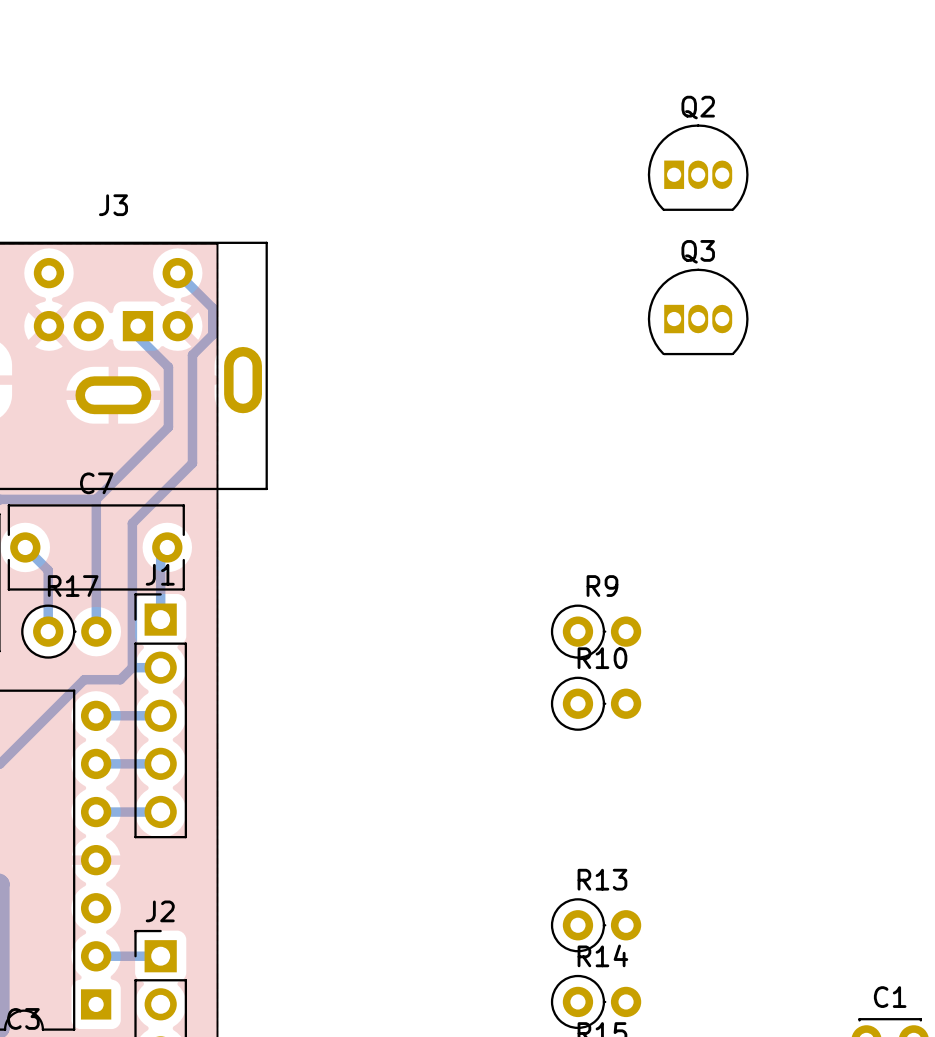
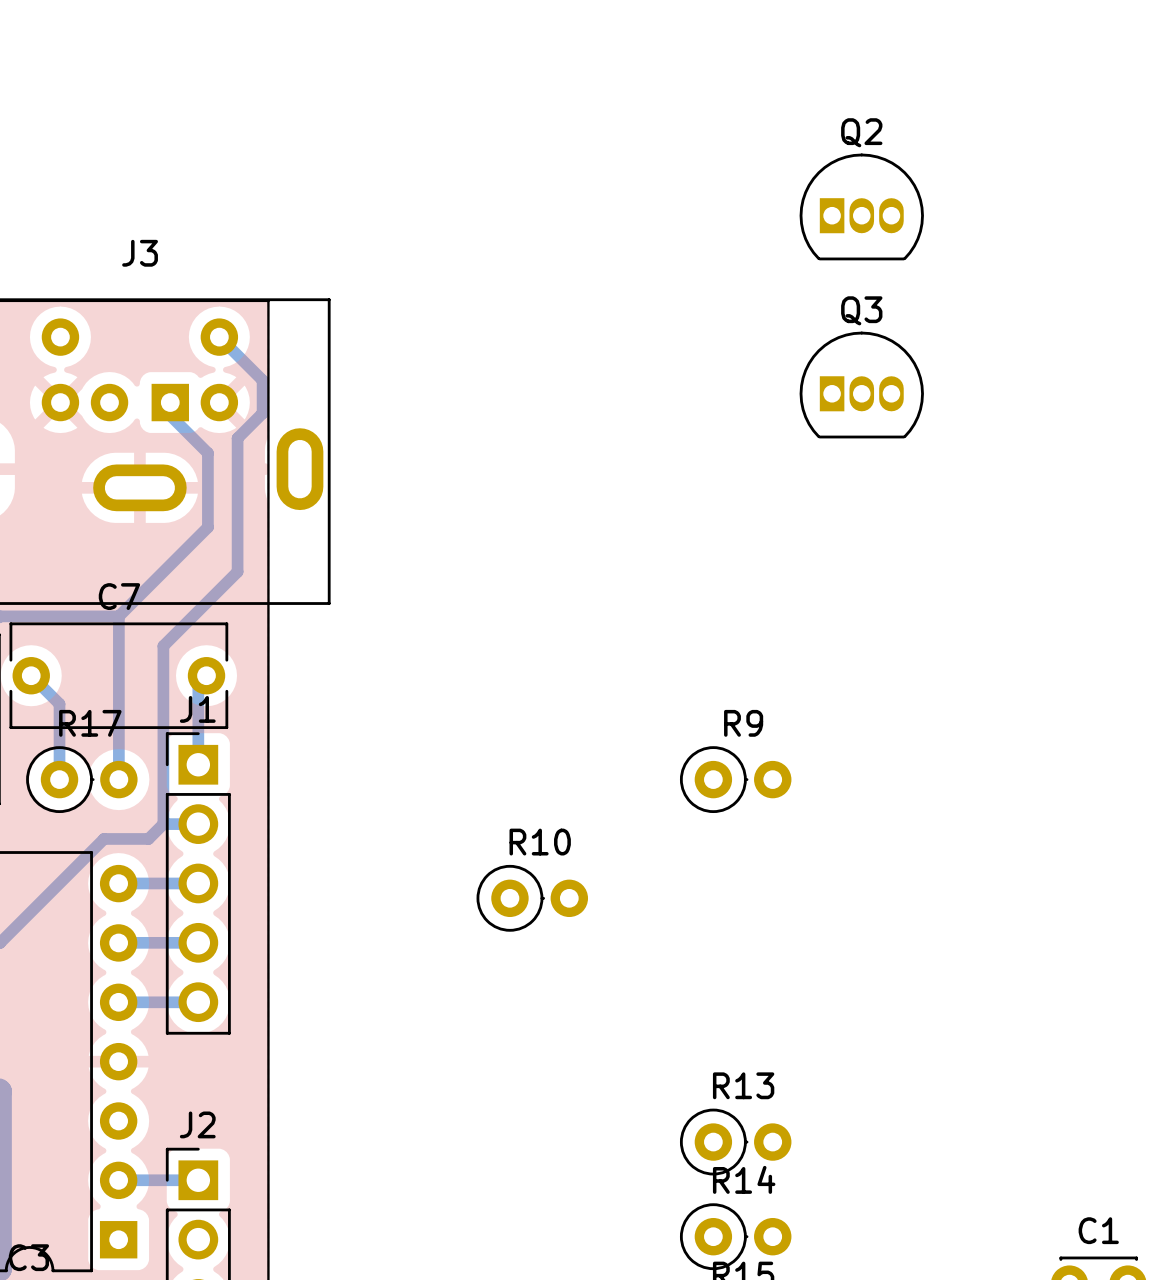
R10 position: (596, 703) -> (532, 898)

